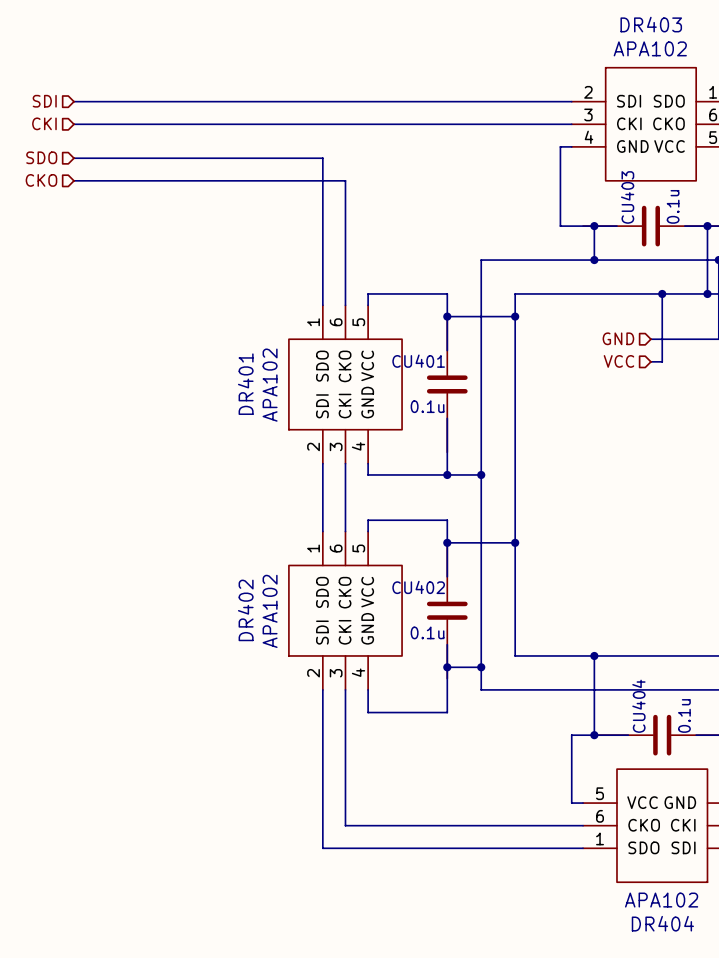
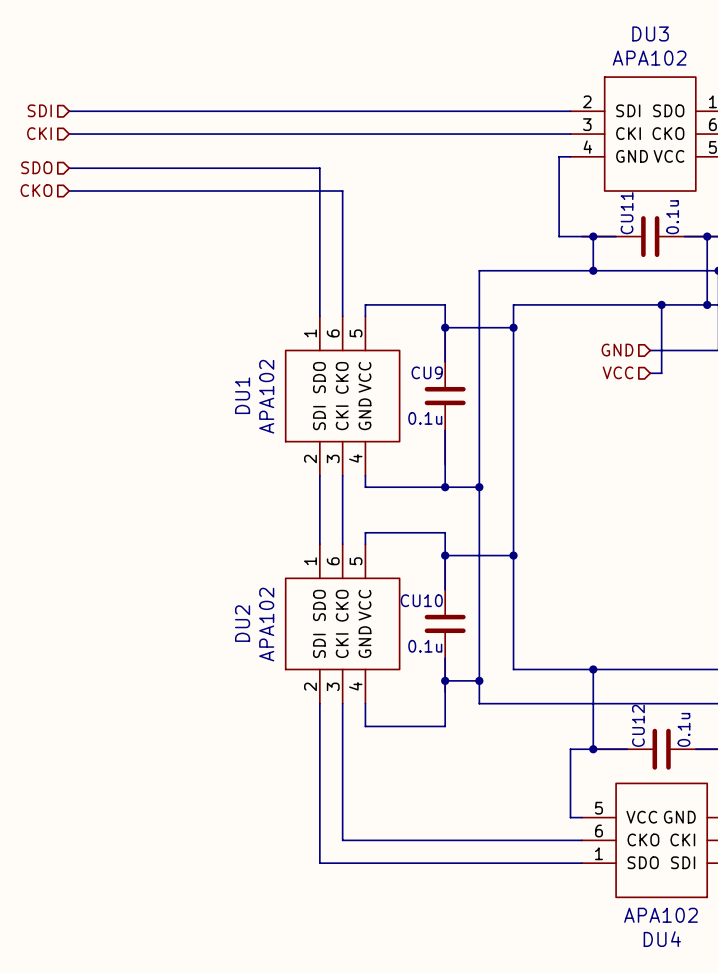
DR403 name: DR403 (651, 24) -> DU3 (650, 33)
CU403 name: CU403 (627, 197) -> CU11 (627, 213)
CU401 name: CU401 (418, 361) -> CU9 (427, 372)
DR401 name: DR401 (245, 384) -> DU1 (242, 395)
CU402 name: CU402 (418, 587) -> CU10 (421, 600)
DR402 name: DR402 (245, 610) -> DU2 (242, 623)
CU404 name: CU404 (638, 706) -> CU12 (638, 725)
DR404 name: DR404 (662, 923) -> DU4 (662, 939)

